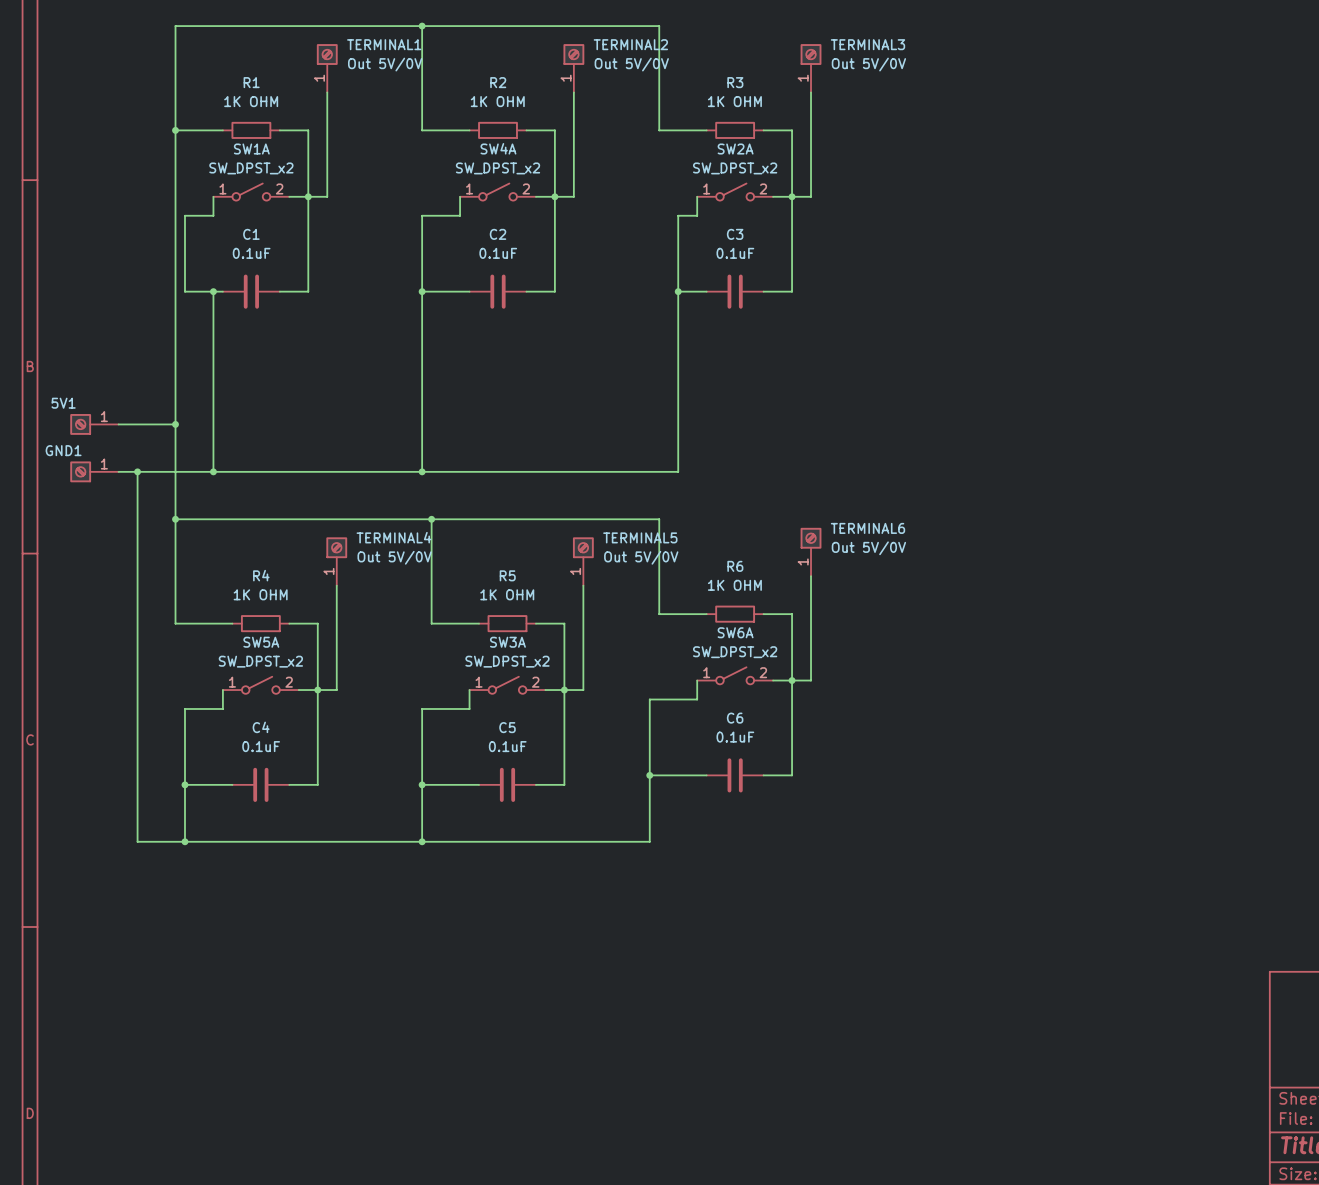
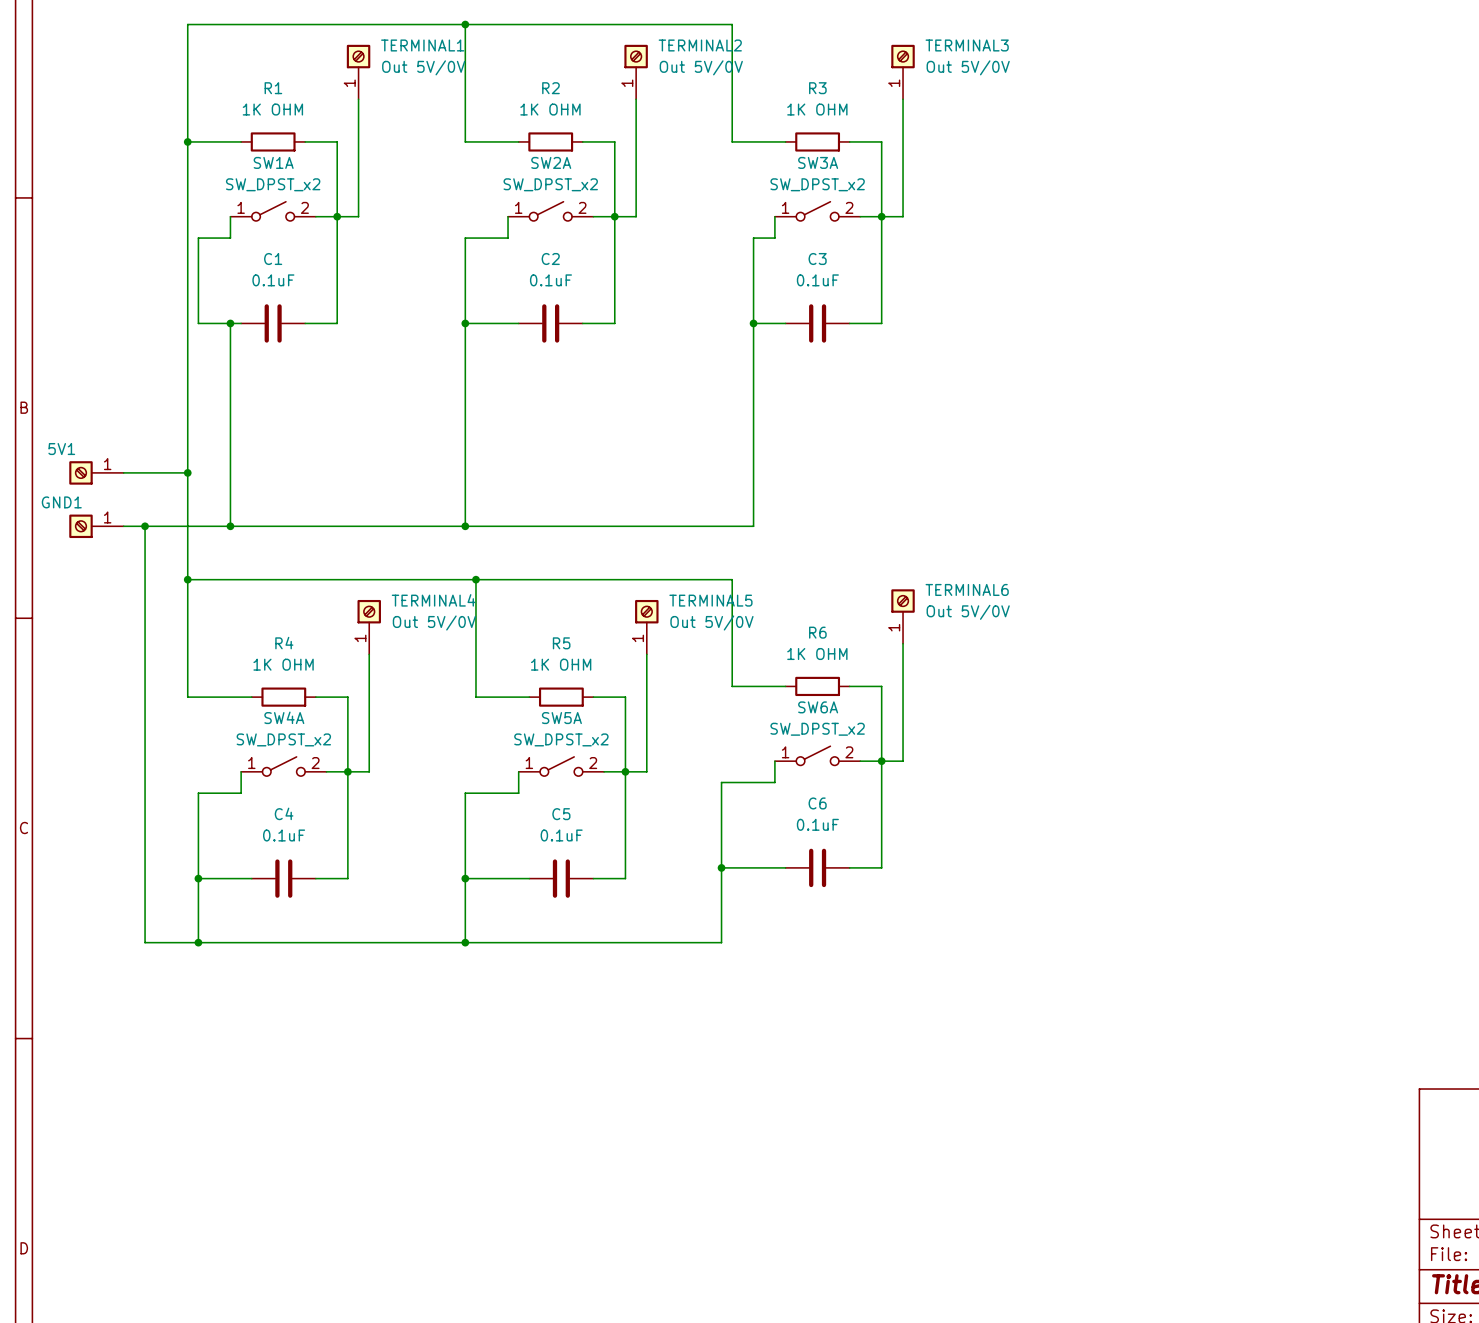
SW4A name: SW4A (498, 148) -> SW2A (551, 162)
SW2A name: SW2A (735, 149) -> SW3A (818, 162)
SW5A name: SW5A (261, 642) -> SW4A (284, 717)
SW3A name: SW3A (507, 642) -> SW5A (561, 718)

